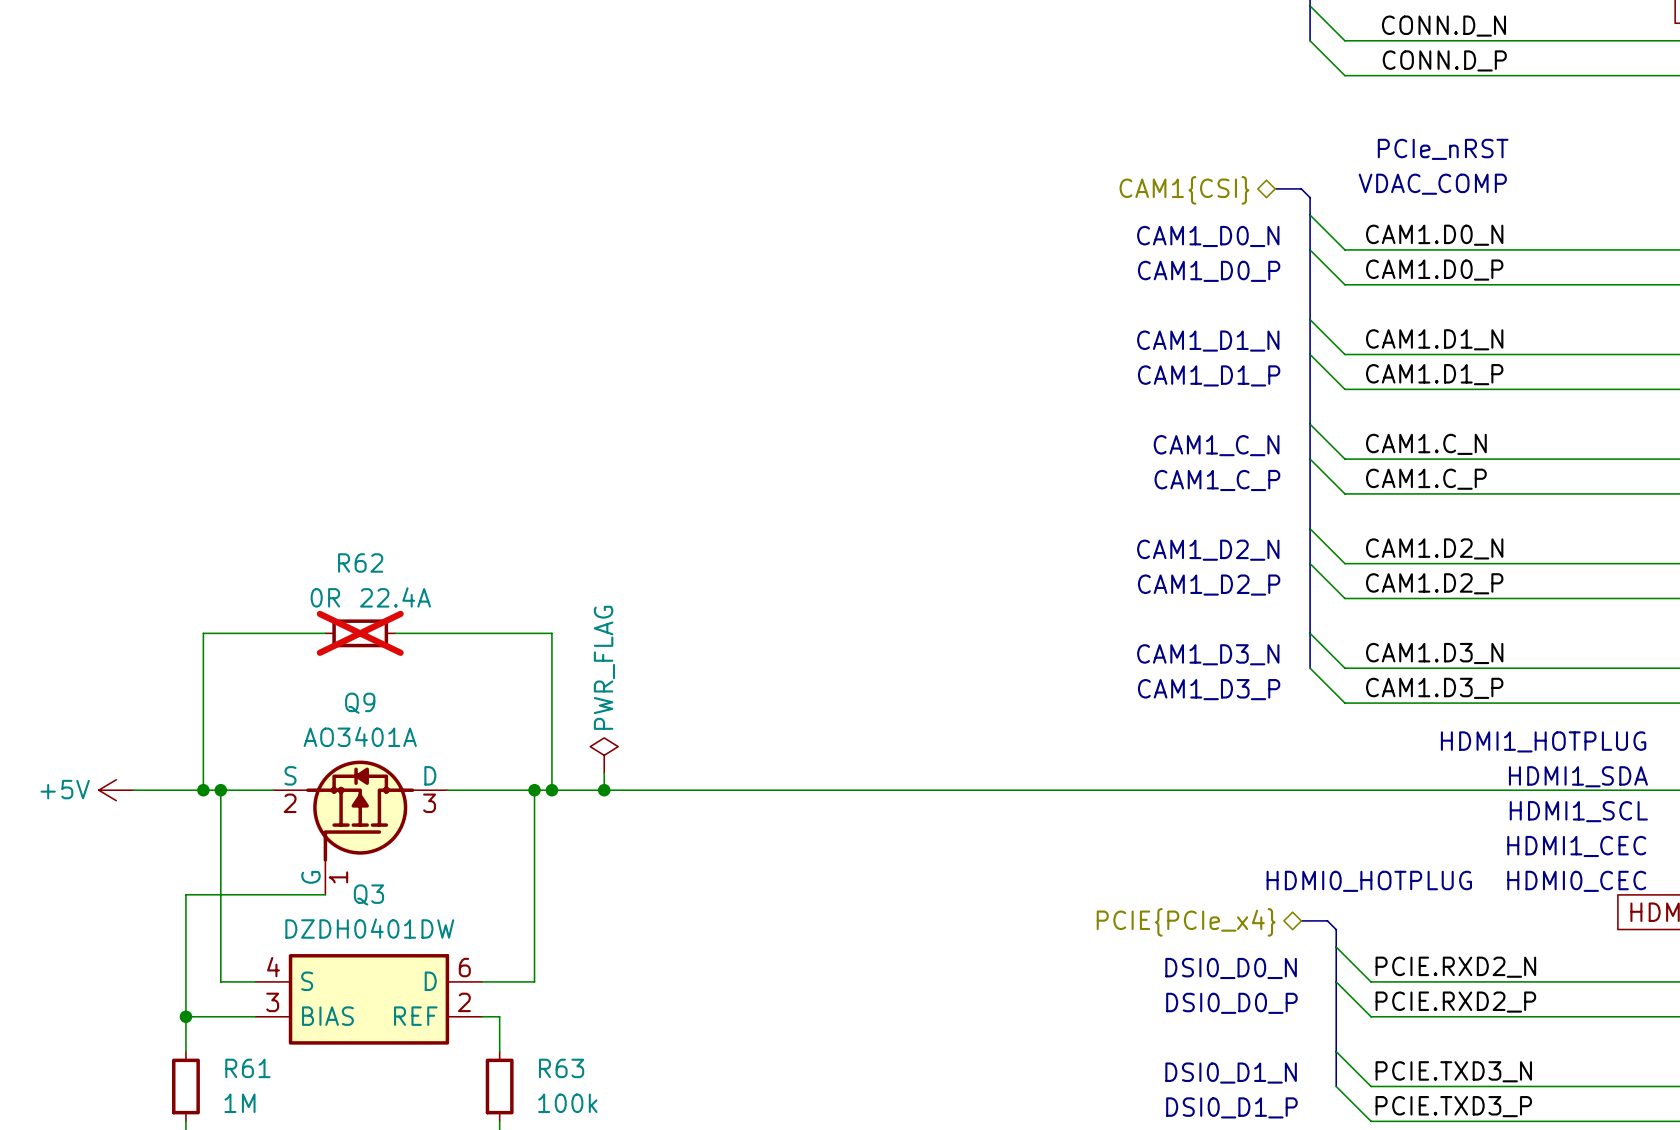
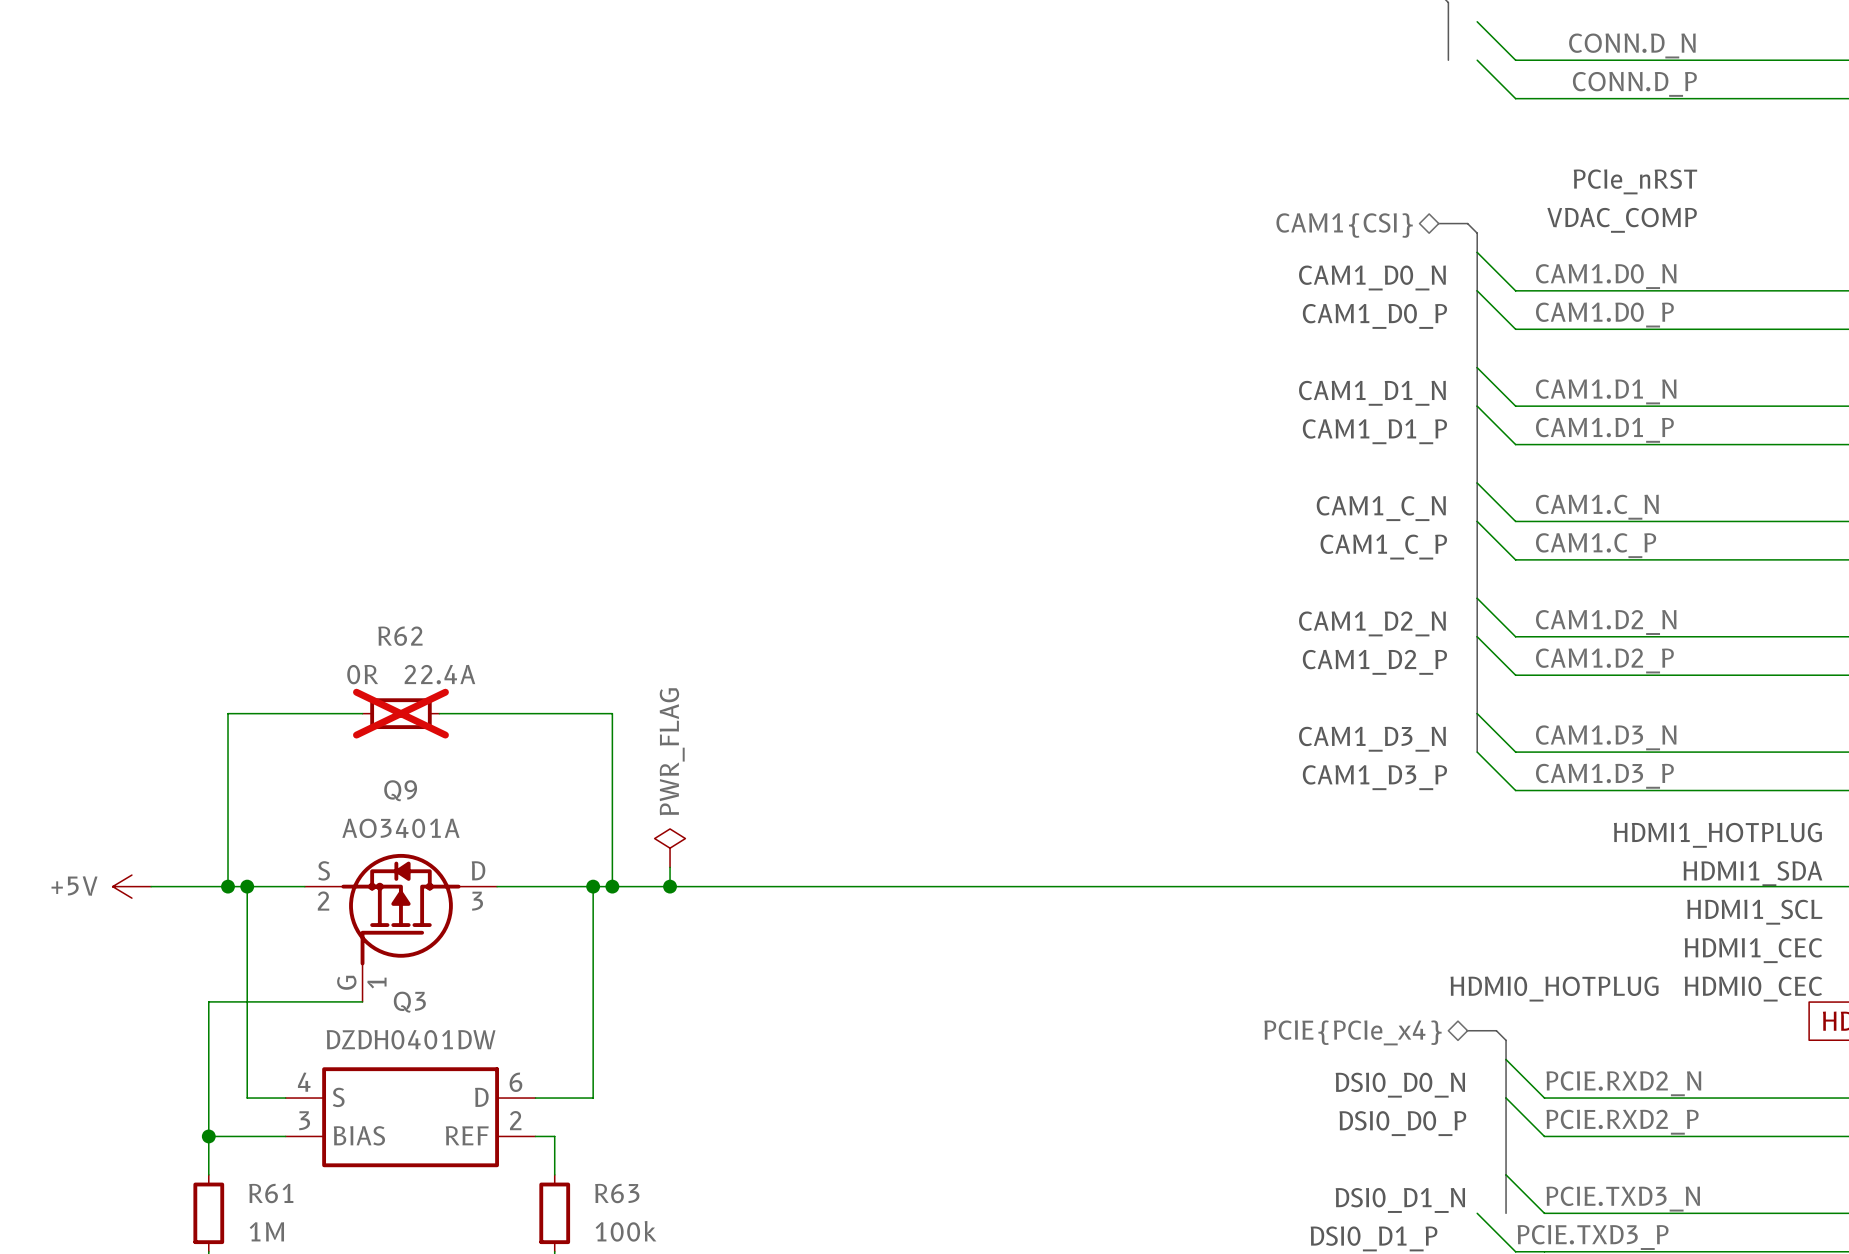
wire: (1310, 5) (1344, 40) (1371, 40) -> (1477, 21) (1515, 60)
label position: CONN.D_N (1443, 26) -> CONN.D_N (1632, 45)
wire: (1310, 40) (1344, 75) (1371, 75) -> (1477, 60) (1515, 98)
label position: CONN.D_P (1444, 60) -> CONN.D_P (1634, 84)
text position: PCIe_nRST (1443, 149) -> PCIe_nRST (1635, 181)
text position: VDAC_COMP (1432, 184) -> VDAC_COMP (1622, 220)
bus: (1275, 188) (1301, 188) (1310, 197) (1310, 668) -> (1438, 223) (1467, 223) (1477, 233) (1477, 752)
hierarchical label position: CAM1{CSI} (1184, 190) -> CAM1{CSI} (1344, 225)
wire: (1310, 215) (1344, 249) (1371, 249) -> (1477, 252) (1515, 290)
label position: CAM1.D0_N (1434, 235) -> CAM1.D0_N (1606, 276)
text position: CAM1_D0_N (1208, 236) -> CAM1_D0_N (1372, 277)
wire: (1310, 249) (1344, 284) (1371, 284) -> (1477, 290) (1515, 329)
label position: CAM1.D0_P (1434, 270) -> CAM1.D0_P (1604, 315)
text position: CAM1_D0_P (1209, 271) -> CAM1_D0_P (1374, 316)
wire: (1310, 319) (1344, 354) (1371, 354) -> (1477, 367) (1515, 406)
label position: CAM1.D1_N (1434, 339) -> CAM1.D1_N (1606, 391)
text position: CAM1_D1_N (1208, 341) -> CAM1_D1_N (1372, 393)
wire: (1310, 354) (1344, 389) (1371, 389) -> (1477, 406) (1515, 444)
label position: CAM1.D1_P (1434, 374) -> CAM1.D1_P (1604, 430)
text position: CAM1_D1_P (1209, 375) -> CAM1_D1_P (1374, 431)
wire: (1310, 424) (1344, 459) (1371, 459) -> (1477, 483) (1515, 521)
label position: CAM1.C_N (1426, 444) -> CAM1.C_N (1597, 507)
text position: CAM1_C_N (1216, 445) -> CAM1_C_N (1381, 508)
wire: (1310, 459) (1344, 493) (1371, 493) -> (1477, 521) (1515, 559)
label position: CAM1.C_P (1426, 479) -> CAM1.C_P (1596, 545)
text position: CAM1_C_P (1217, 480) -> CAM1_C_P (1383, 547)
wire: (1310, 528) (1344, 563) (1371, 563) -> (1477, 598) (1515, 636)
label position: CAM1.D2_N (1434, 548) -> CAM1.D2_N (1606, 622)
text position: CAM1_D2_N (1208, 550) -> CAM1_D2_N (1372, 623)
wire: (1310, 563) (1344, 598) (1371, 598) -> (1477, 636) (1515, 675)
label position: CAM1.D2_P (1434, 583) -> CAM1.D2_P (1604, 660)
text position: CAM1_D2_P (1209, 585) -> CAM1_D2_P (1374, 662)
wire: (1310, 633) (1344, 668) (1371, 668) -> (1477, 713) (1515, 752)
label position: CAM1.D3_N (1434, 653) -> CAM1.D3_N (1606, 737)
text position: CAM1_D3_N (1208, 654) -> CAM1_D3_N (1372, 739)
wire: (1310, 668) (1344, 703) (1371, 703) -> (1477, 752) (1515, 790)
label position: CAM1.D3_P (1434, 688) -> CAM1.D3_P (1604, 776)
text position: CAM1_D3_P (1209, 689) -> CAM1_D3_P (1374, 777)
text position: HDMI0_HOTPLUG (1369, 881) -> HDMI0_HOTPLUG (1554, 989)
bus: (1301, 920) (1327, 920) (1336, 929) (1336, 1086) -> (1467, 1030) (1496, 1030) (1506, 1040) (1506, 1213)
hierarchical label position: PCIE{PCIe_x4} (1186, 922) -> PCIE{PCIe_x4} (1352, 1032)
wire: (1336, 947) (1371, 981) (1397, 981) -> (1506, 1059) (1544, 1098)
label position: PCIE.RXD2_N (1455, 967) -> PCIE.RXD2_N (1623, 1083)
text position: DSI0_D0_N (1231, 968) -> DSI0_D0_N (1400, 1085)
wire: (1336, 981) (1371, 1016) (1397, 1016) -> (1506, 1098) (1544, 1136)
label position: PCIE.RXD2_P (1455, 1002) -> PCIE.RXD2_P (1622, 1122)
text position: DSI0_D0_P (1231, 1003) -> DSI0_D0_P (1402, 1123)
wire: (1336, 1051) (1371, 1086) (1397, 1086) -> (1506, 1174) (1544, 1213)
label position: PCIE.TXD3_N (1453, 1071) -> PCIE.TXD3_N (1623, 1199)
text position: DSI0_D1_N (1231, 1073) -> DSI0_D1_N (1400, 1200)

